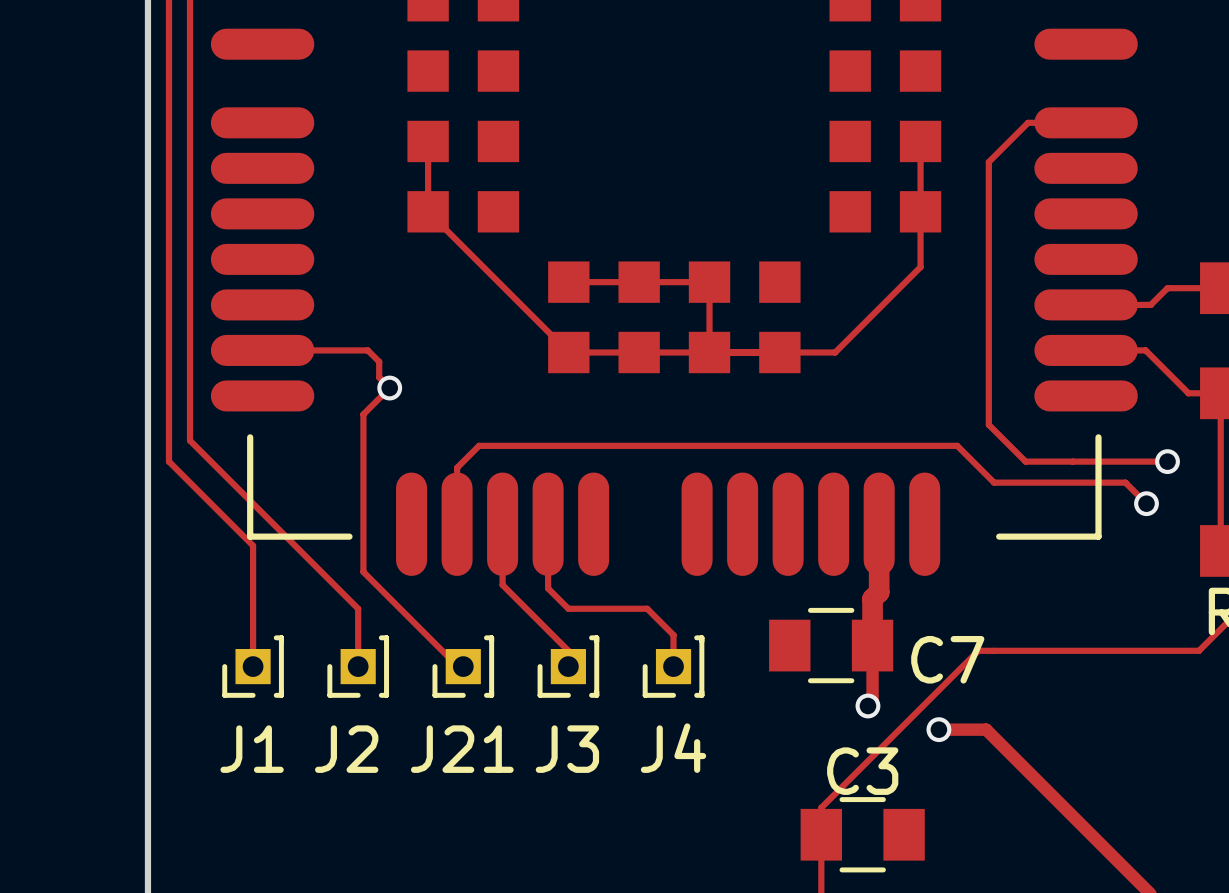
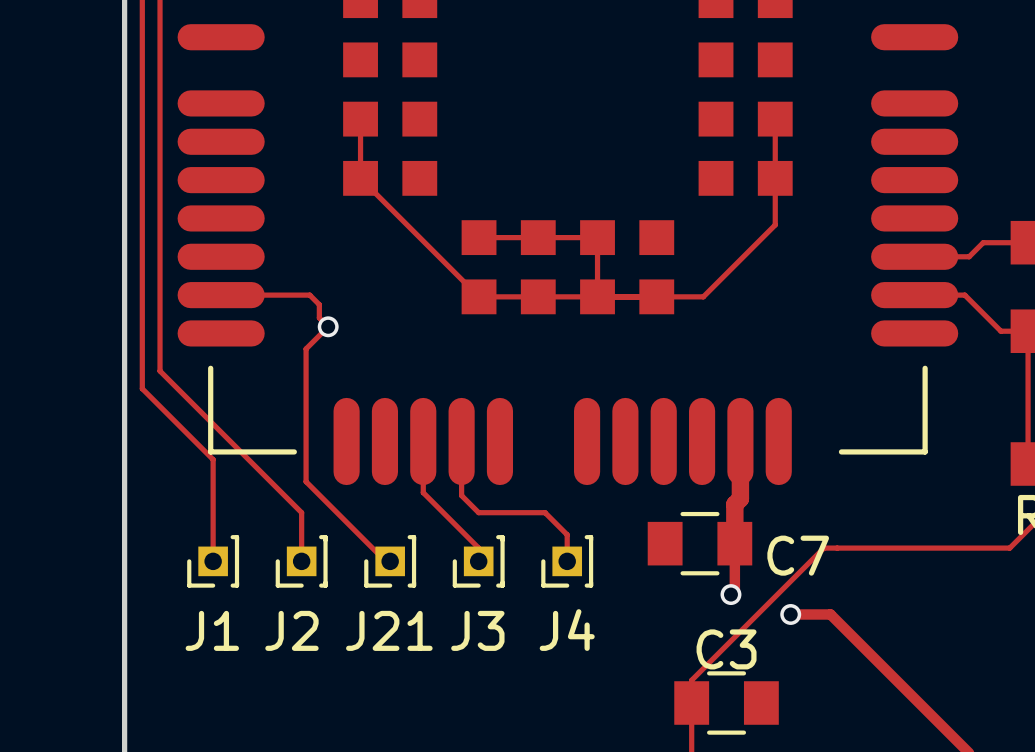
track: (1086, 122) (1028, 122) (988, 162) (988, 424) (1025, 461) (1167, 461) -> none
via: (1167, 461) -> none
track: (1146, 503) (1125, 482) (994, 482) (957, 445) (479, 445) (457, 467) (457, 524) -> none
via: (1146, 503) -> none

